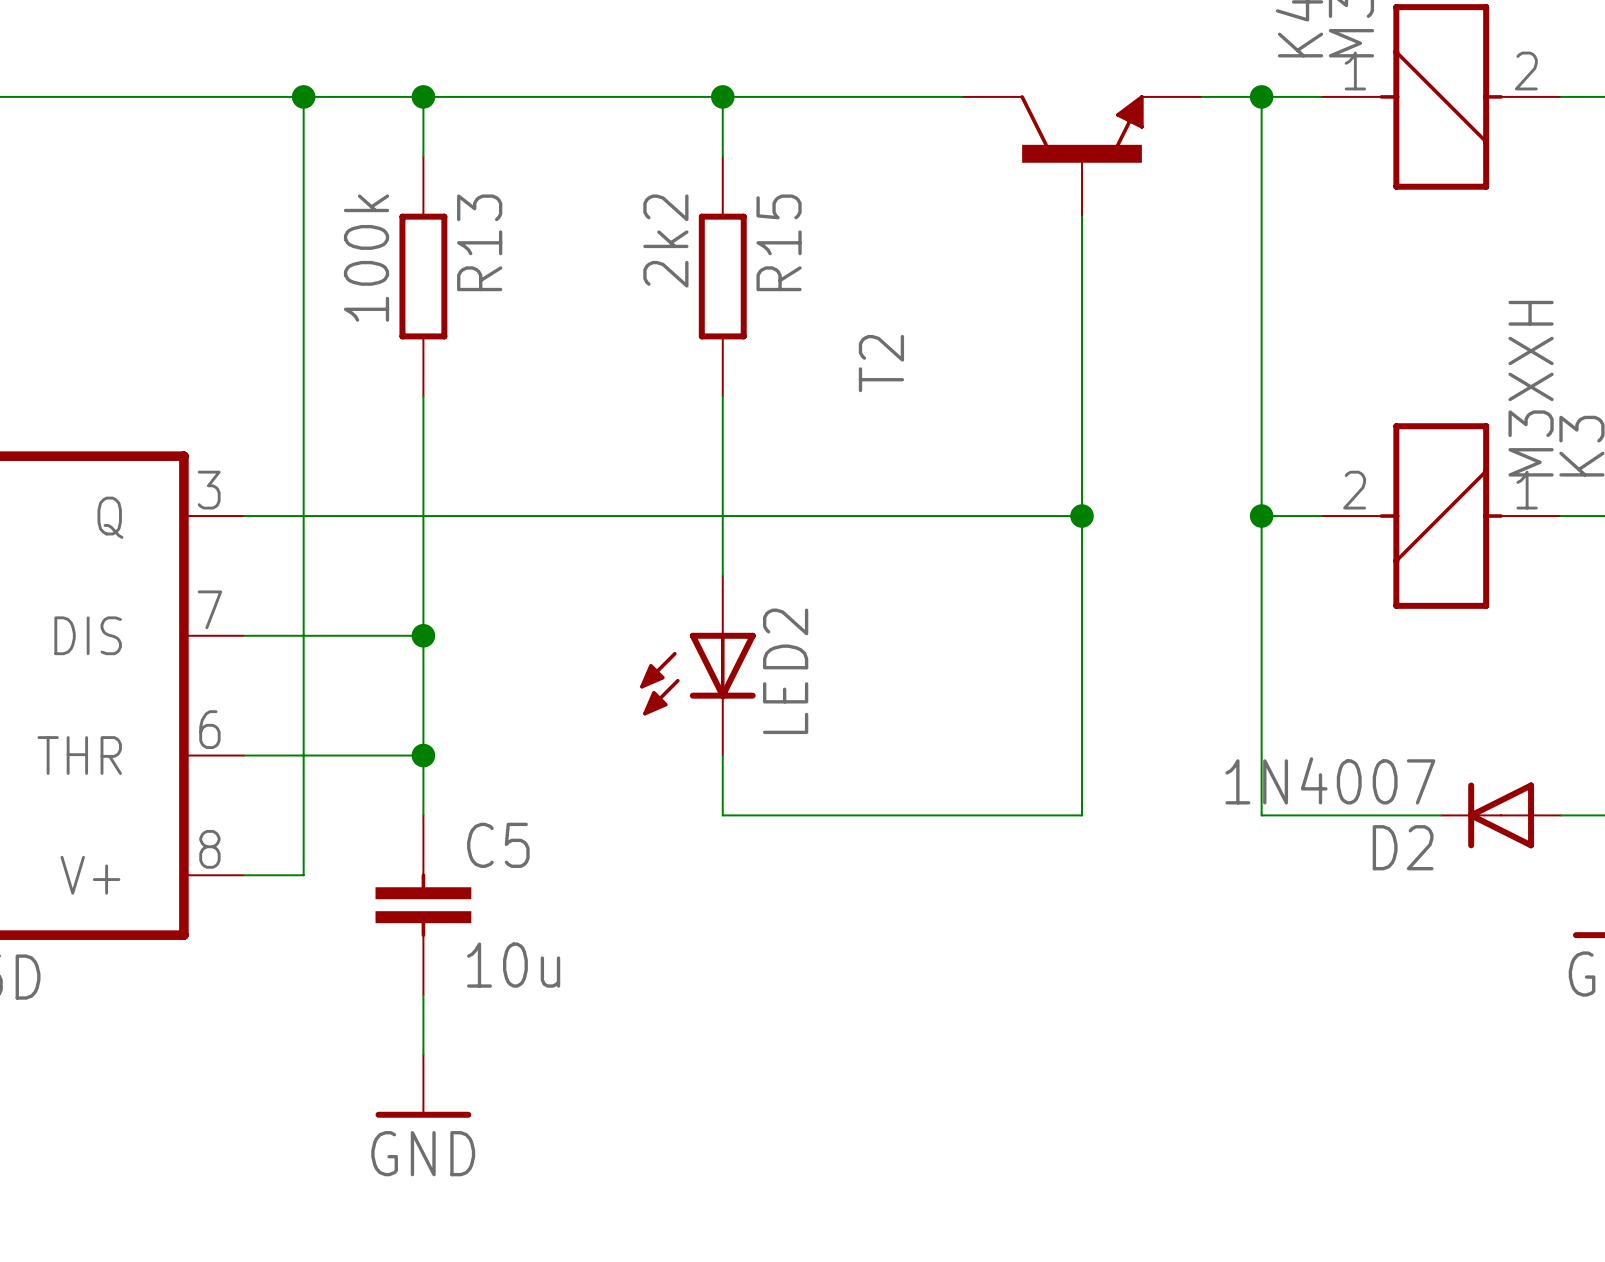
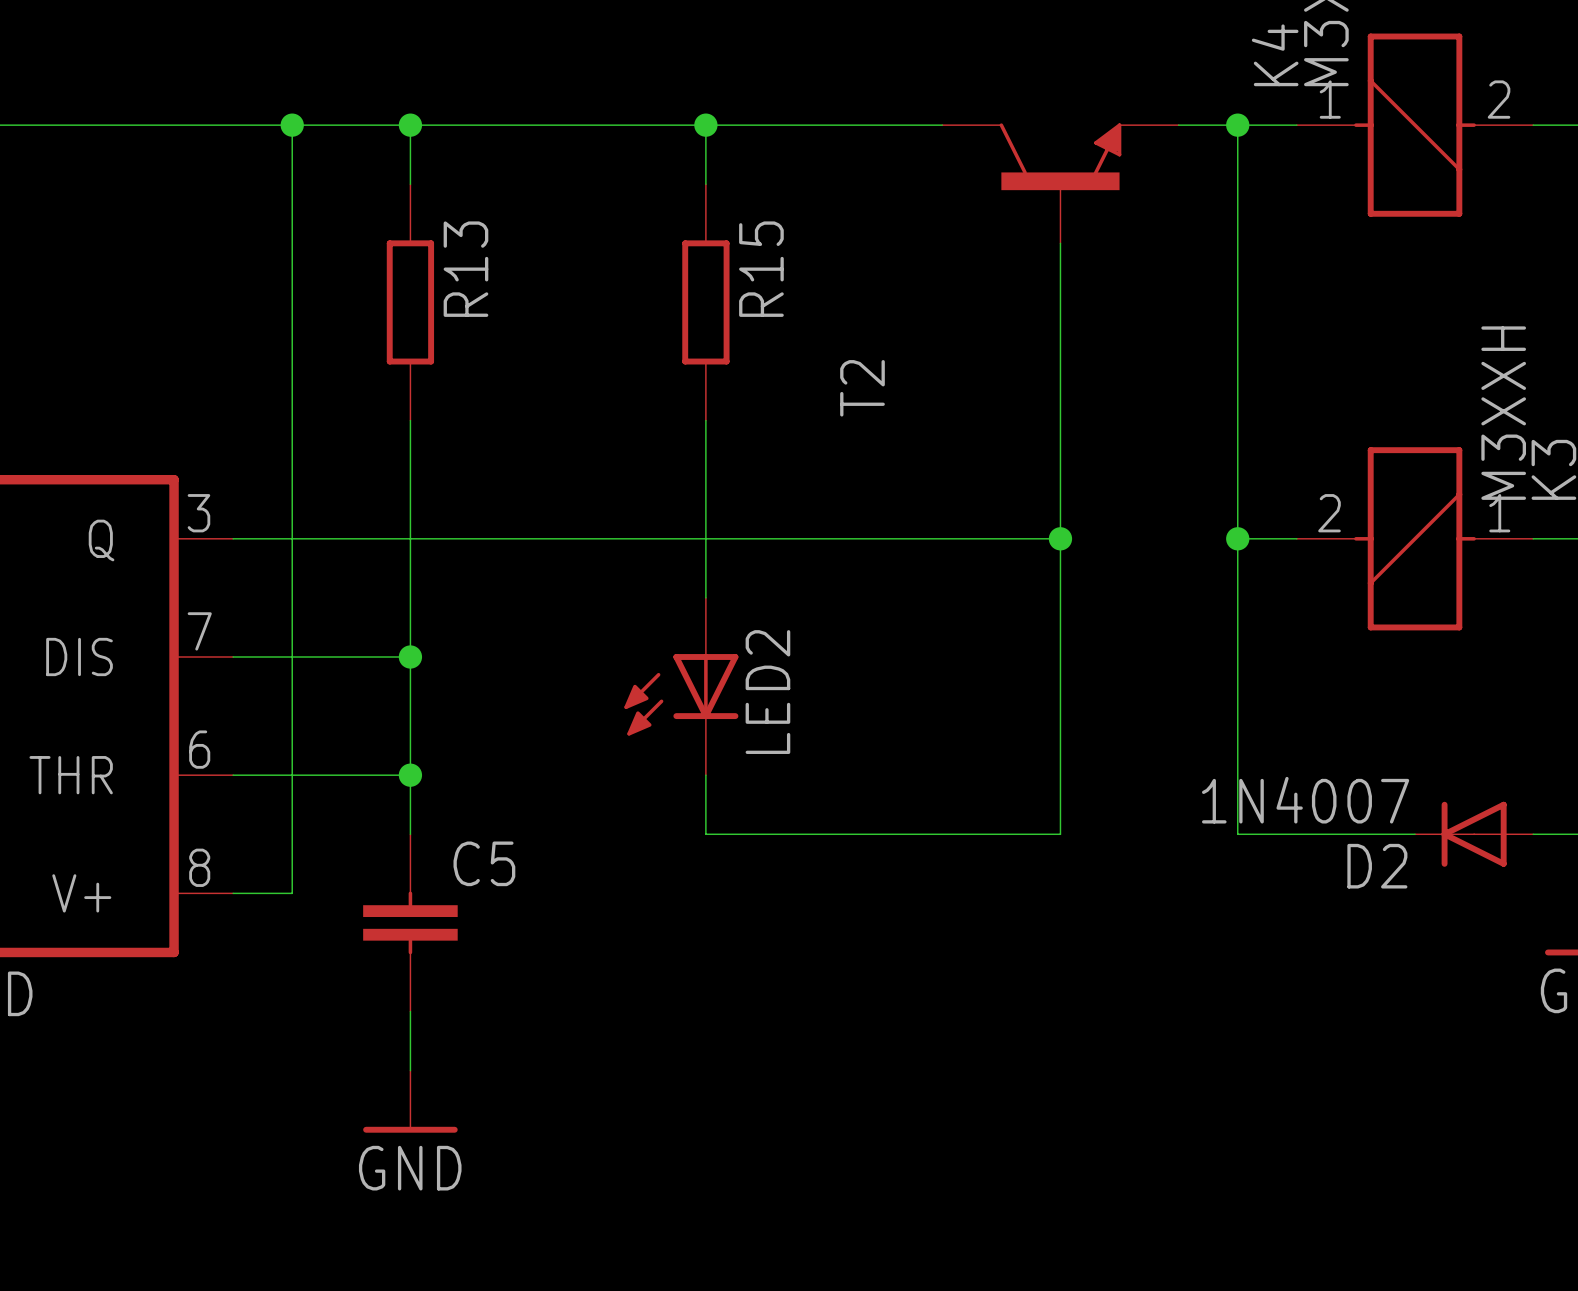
R15 value: 2k2 (665, 241) -> none
R13 value: 100k (366, 258) -> none
C5 value: 10u (513, 965) -> none

